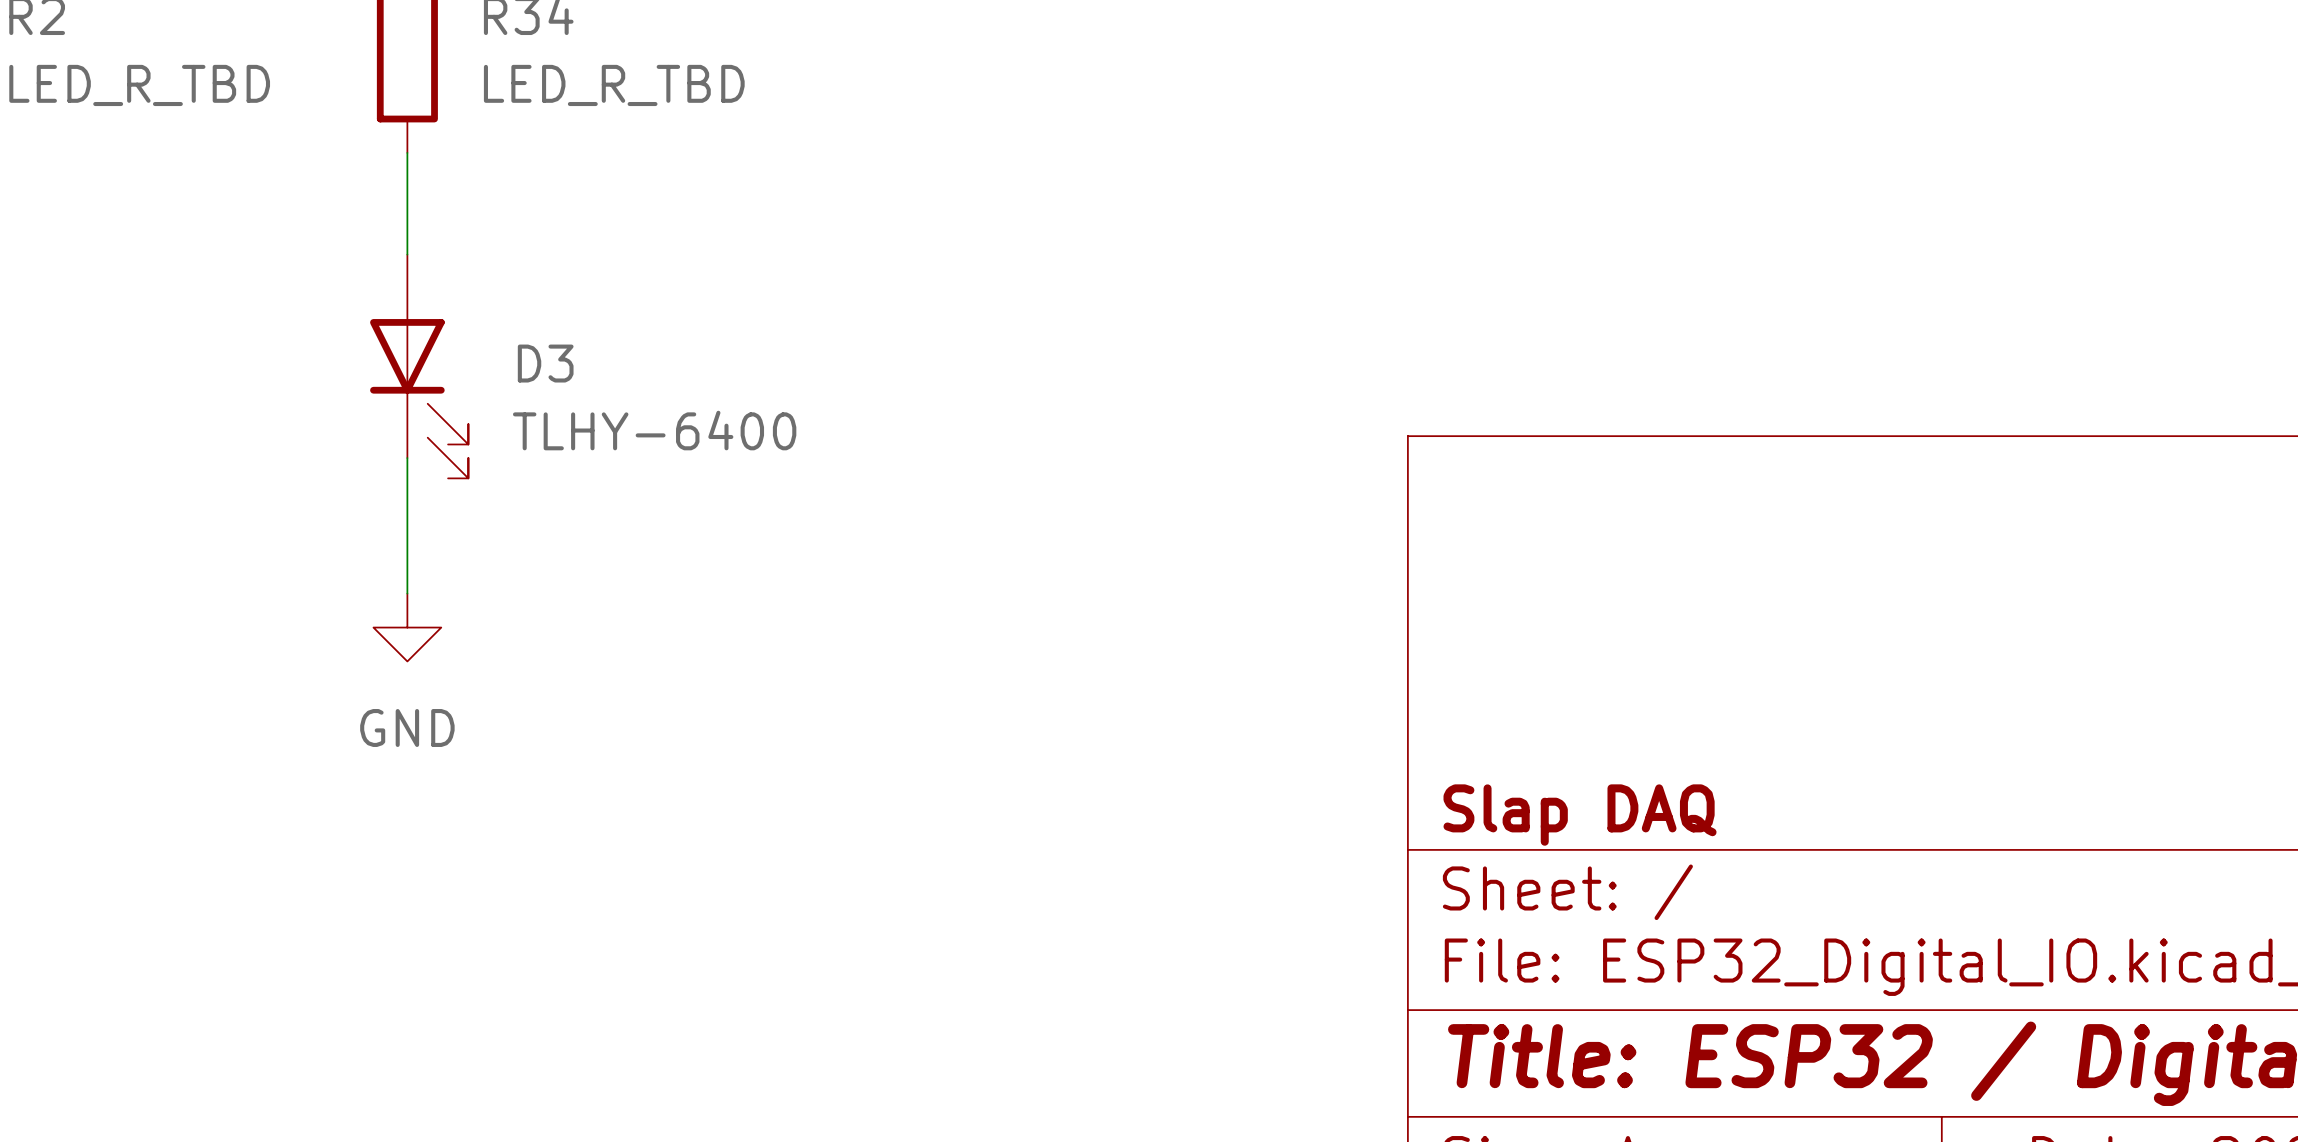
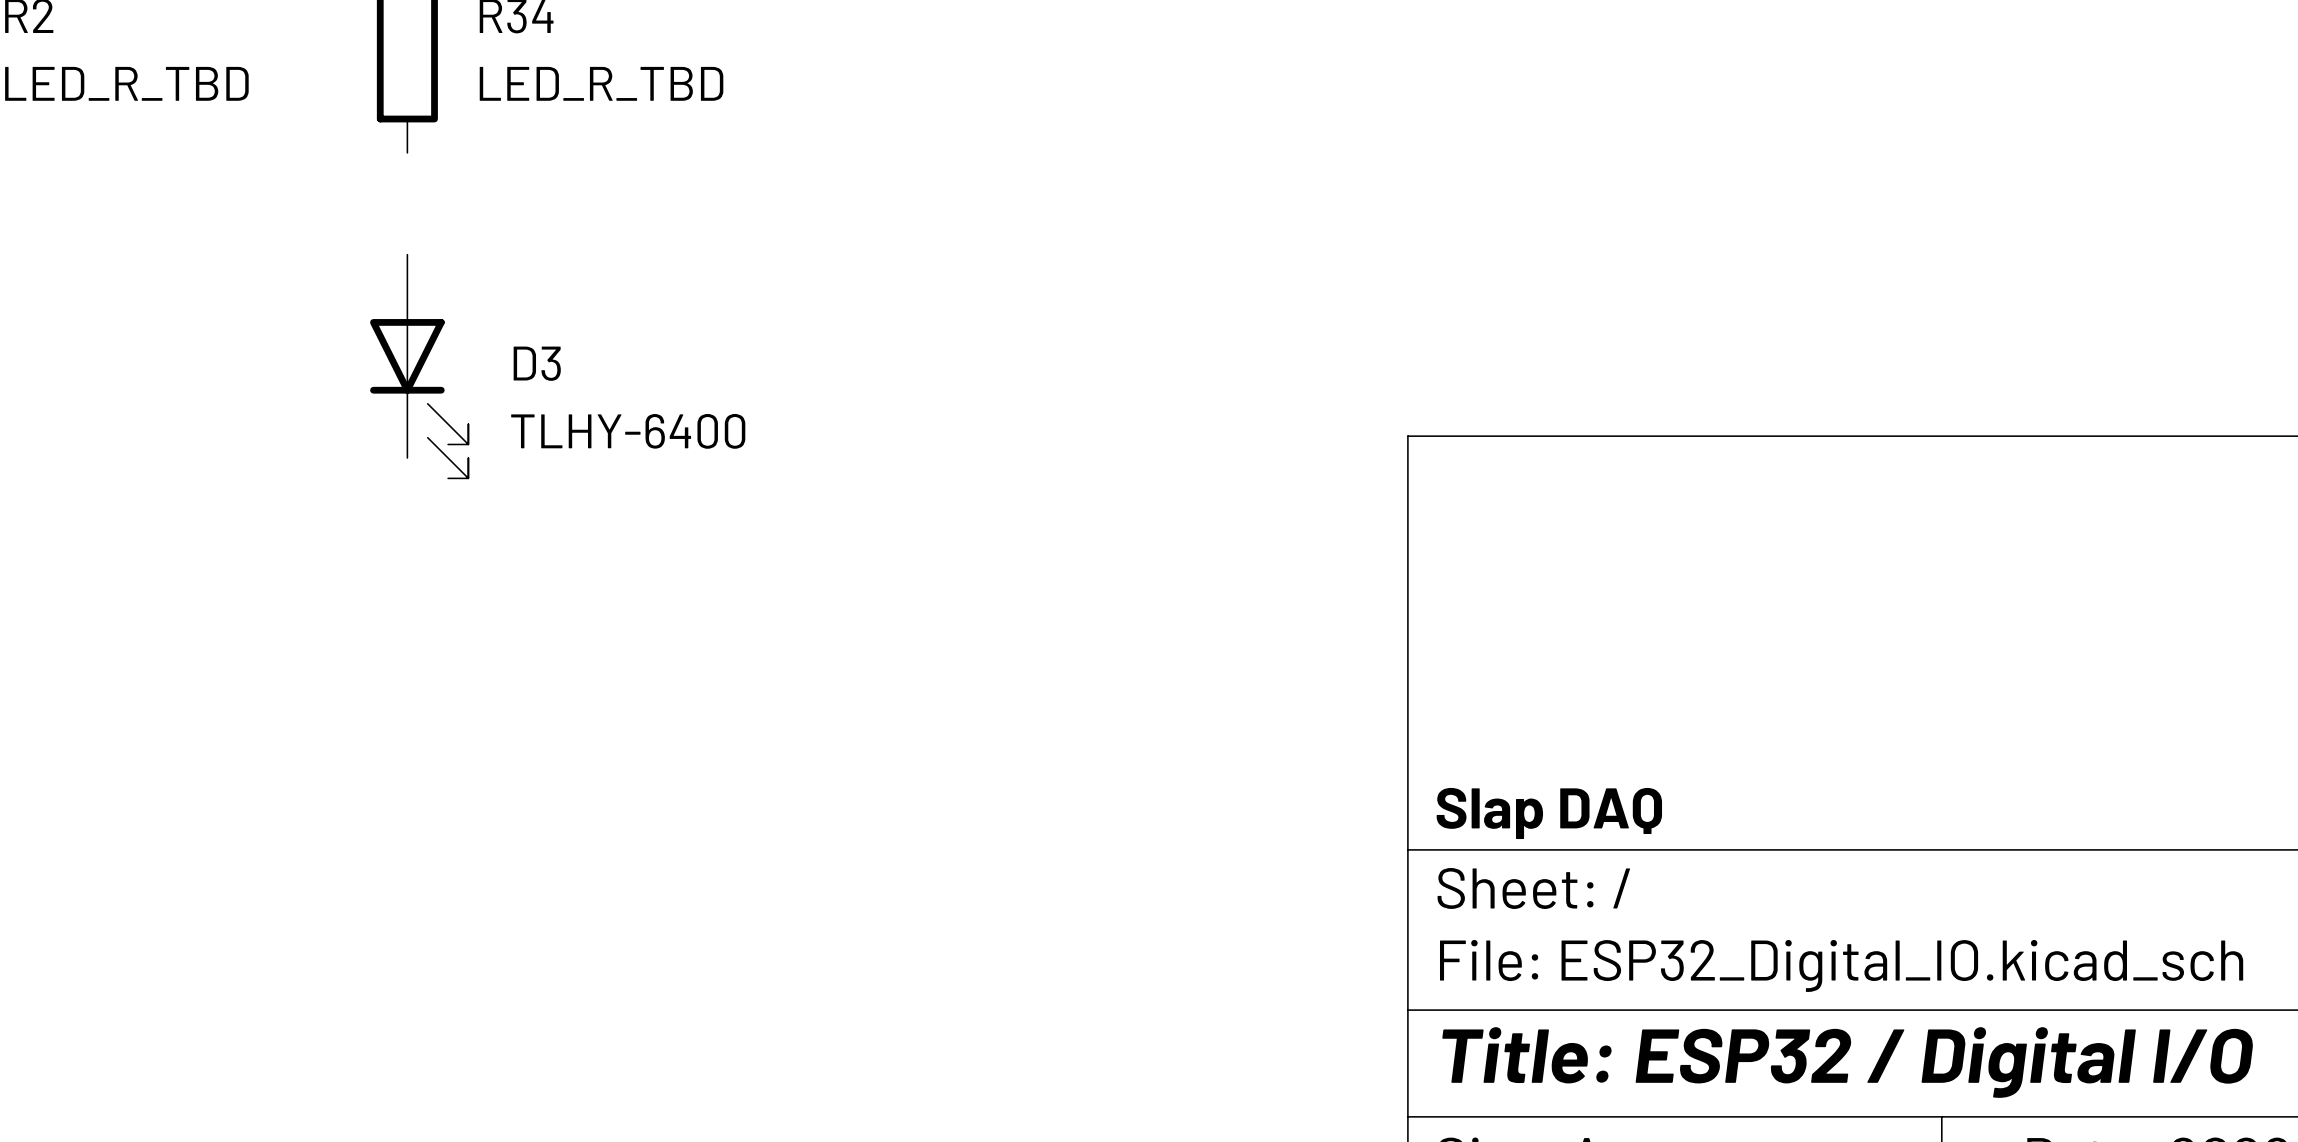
wire: (407, 152) (407, 254) -> none
wire: (407, 458) (407, 593) -> none
power symbol: GND (407, 627) -> none

